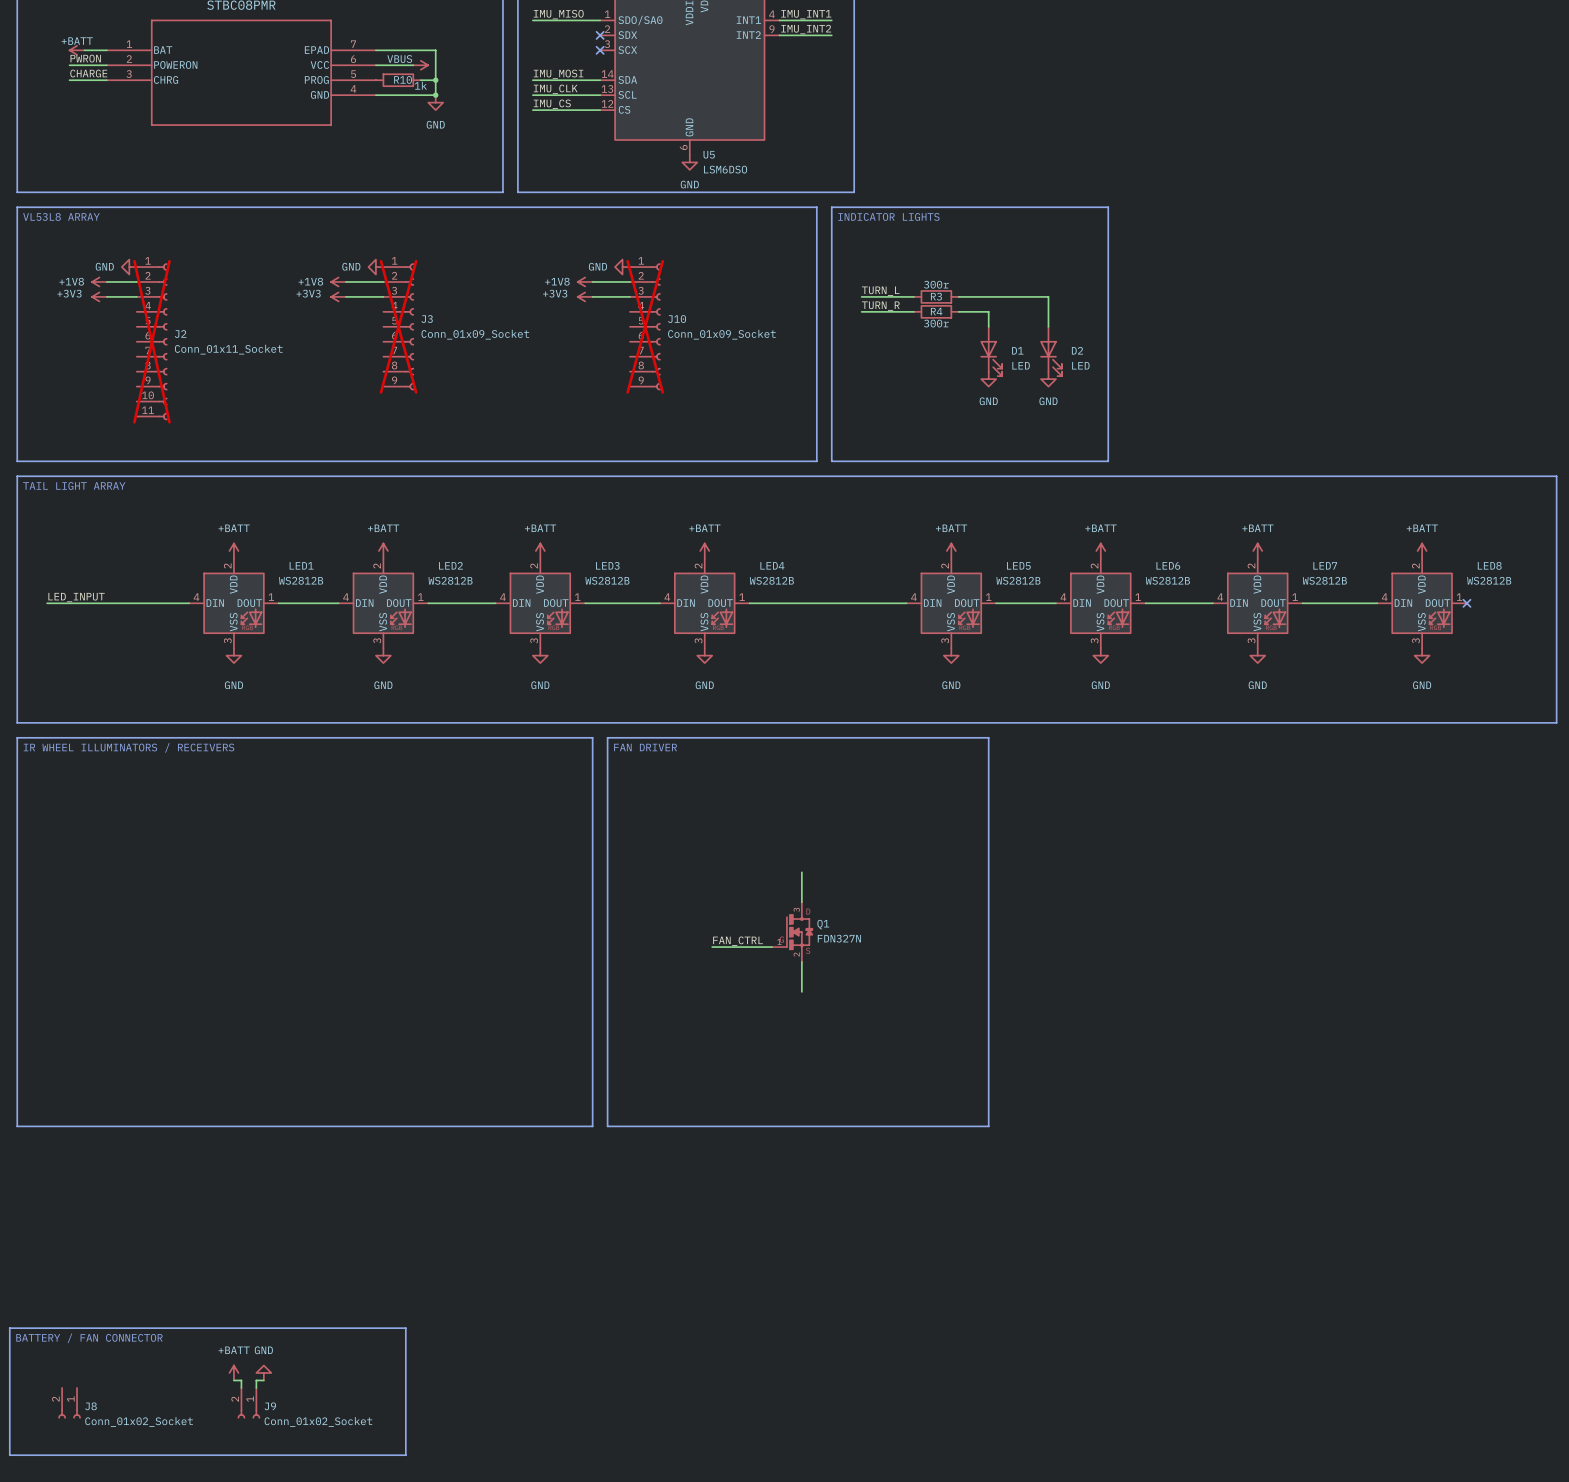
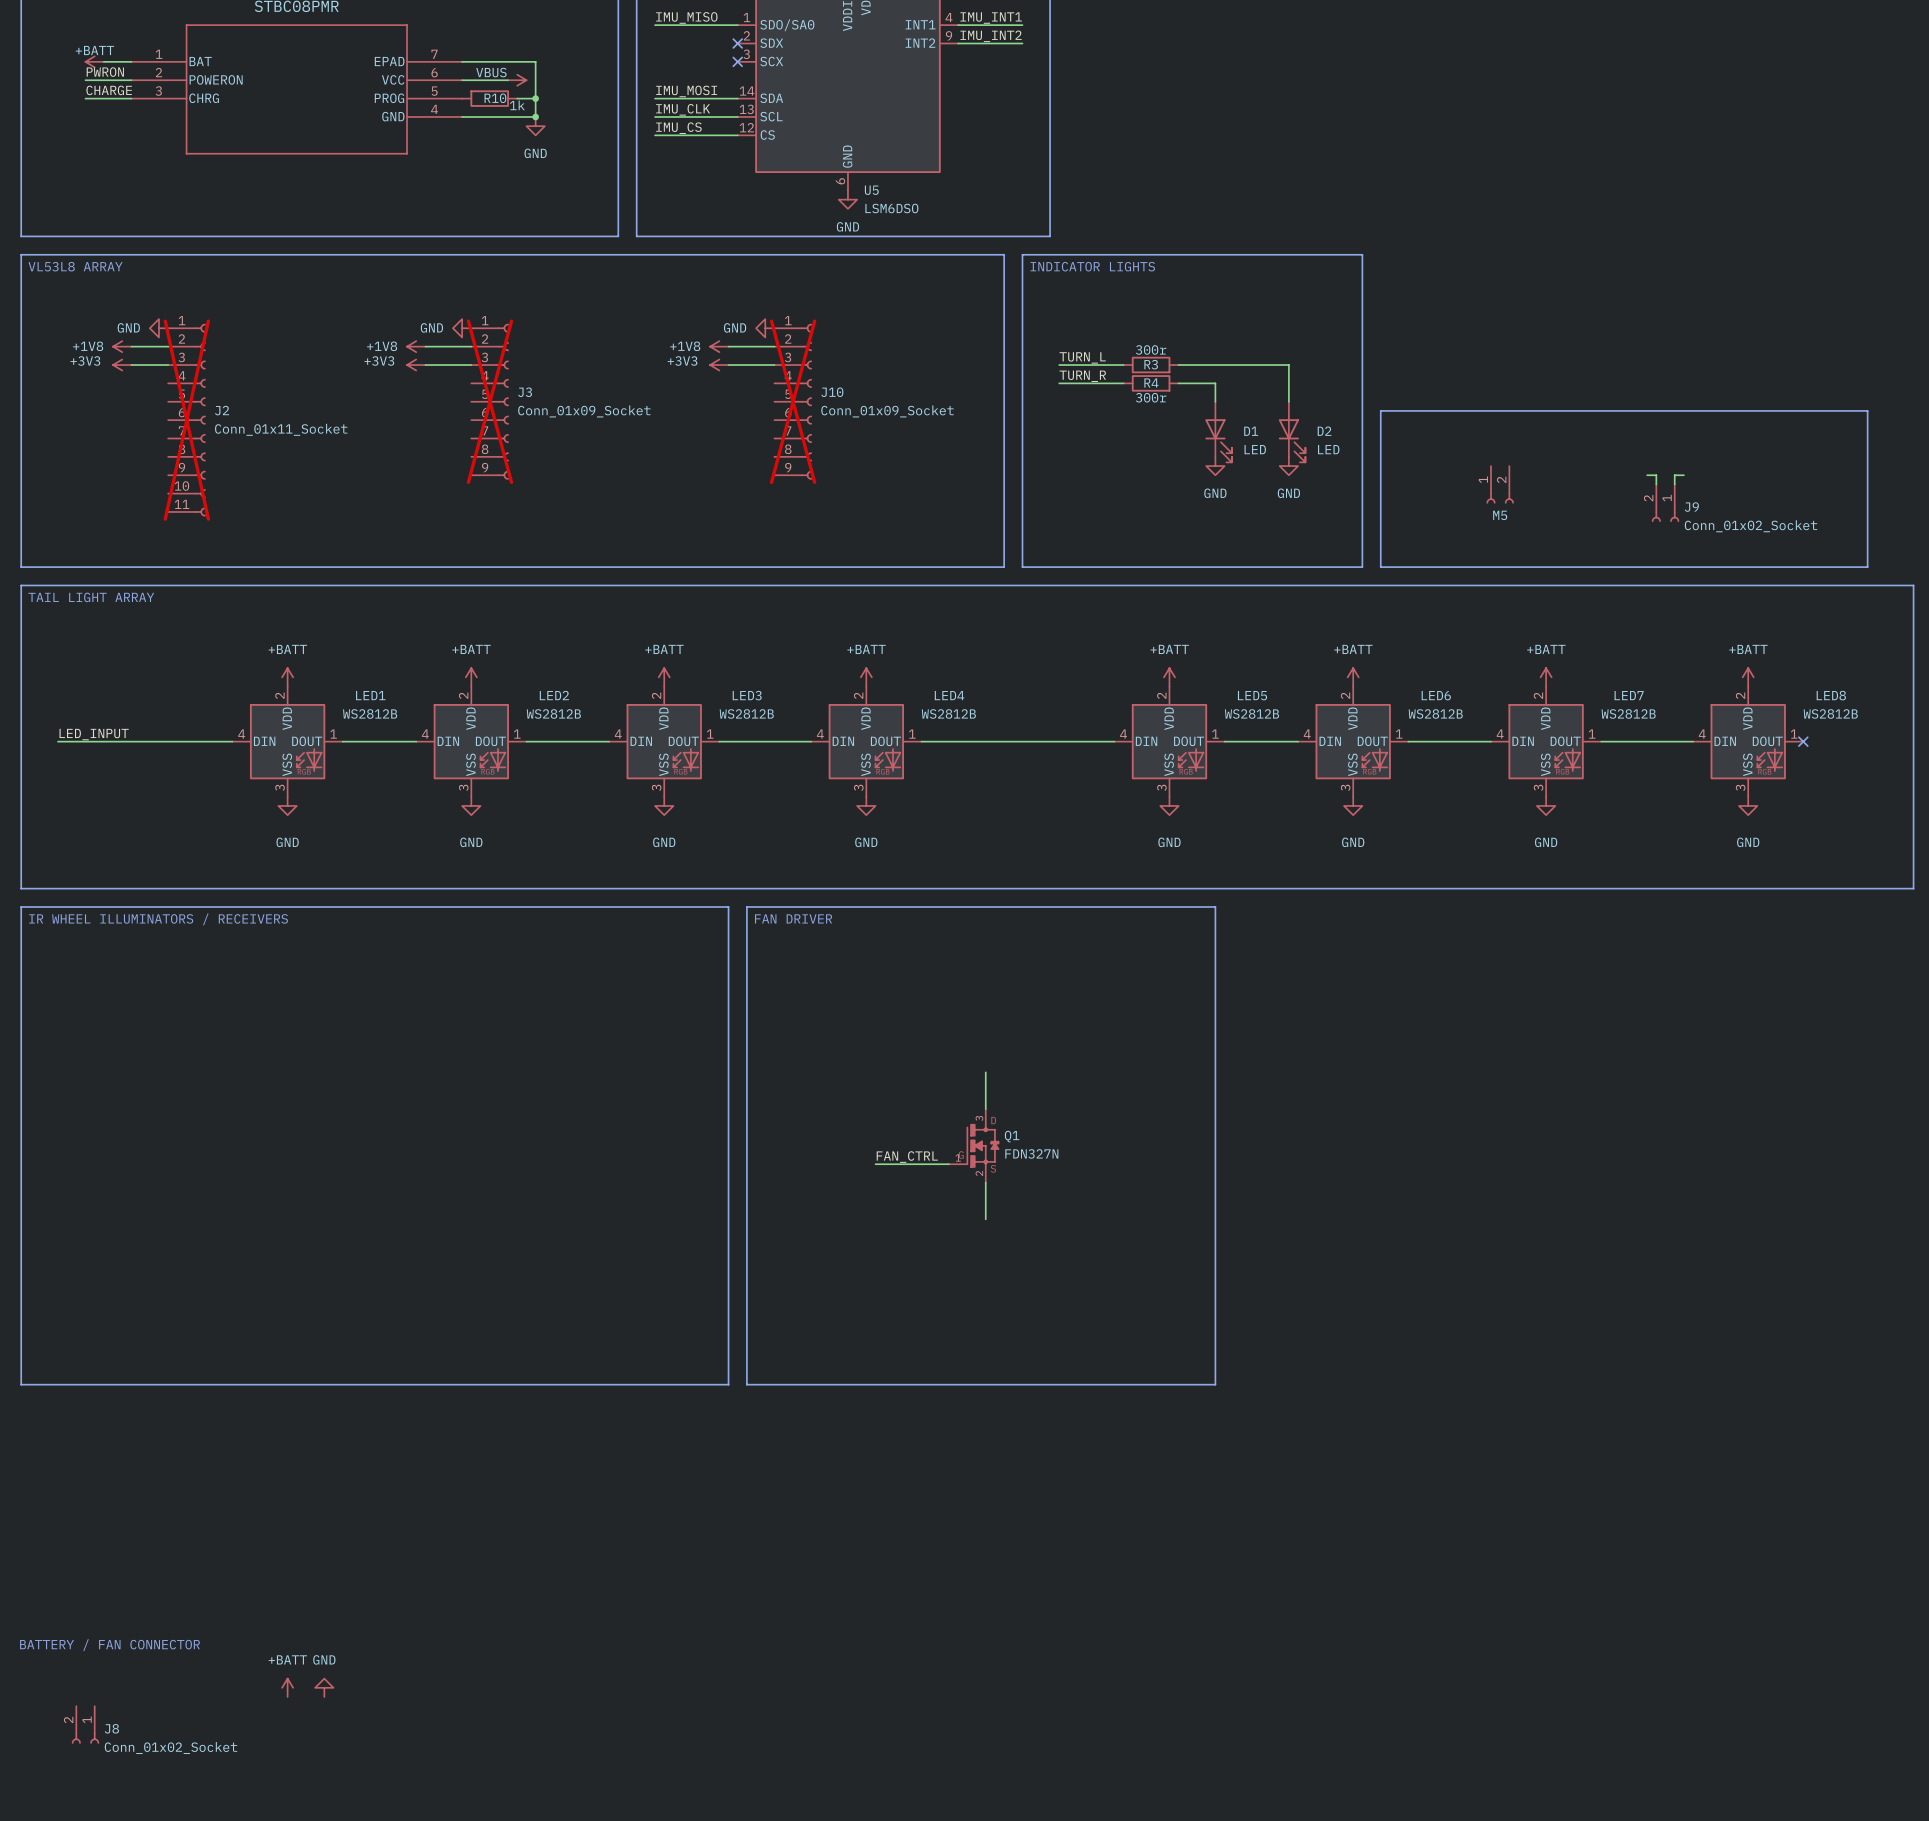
line: none -> (1380, 410) (1867, 410) (1867, 567) (1380, 567) (1380, 410)
wire: none -> (1647, 475) (1656, 475) (1656, 484)
wire: none -> (1683, 475) (1674, 475) (1674, 484)
M5: none -> (1500, 484)
line: (9, 1328) (405, 1328) (405, 1455) (9, 1455) (9, 1328) -> none
wire: (233, 1380) (241, 1380) (241, 1387) -> none
wire: (263, 1380) (256, 1380) (256, 1387) -> none
J9 position: (248, 1403) -> (1665, 503)

